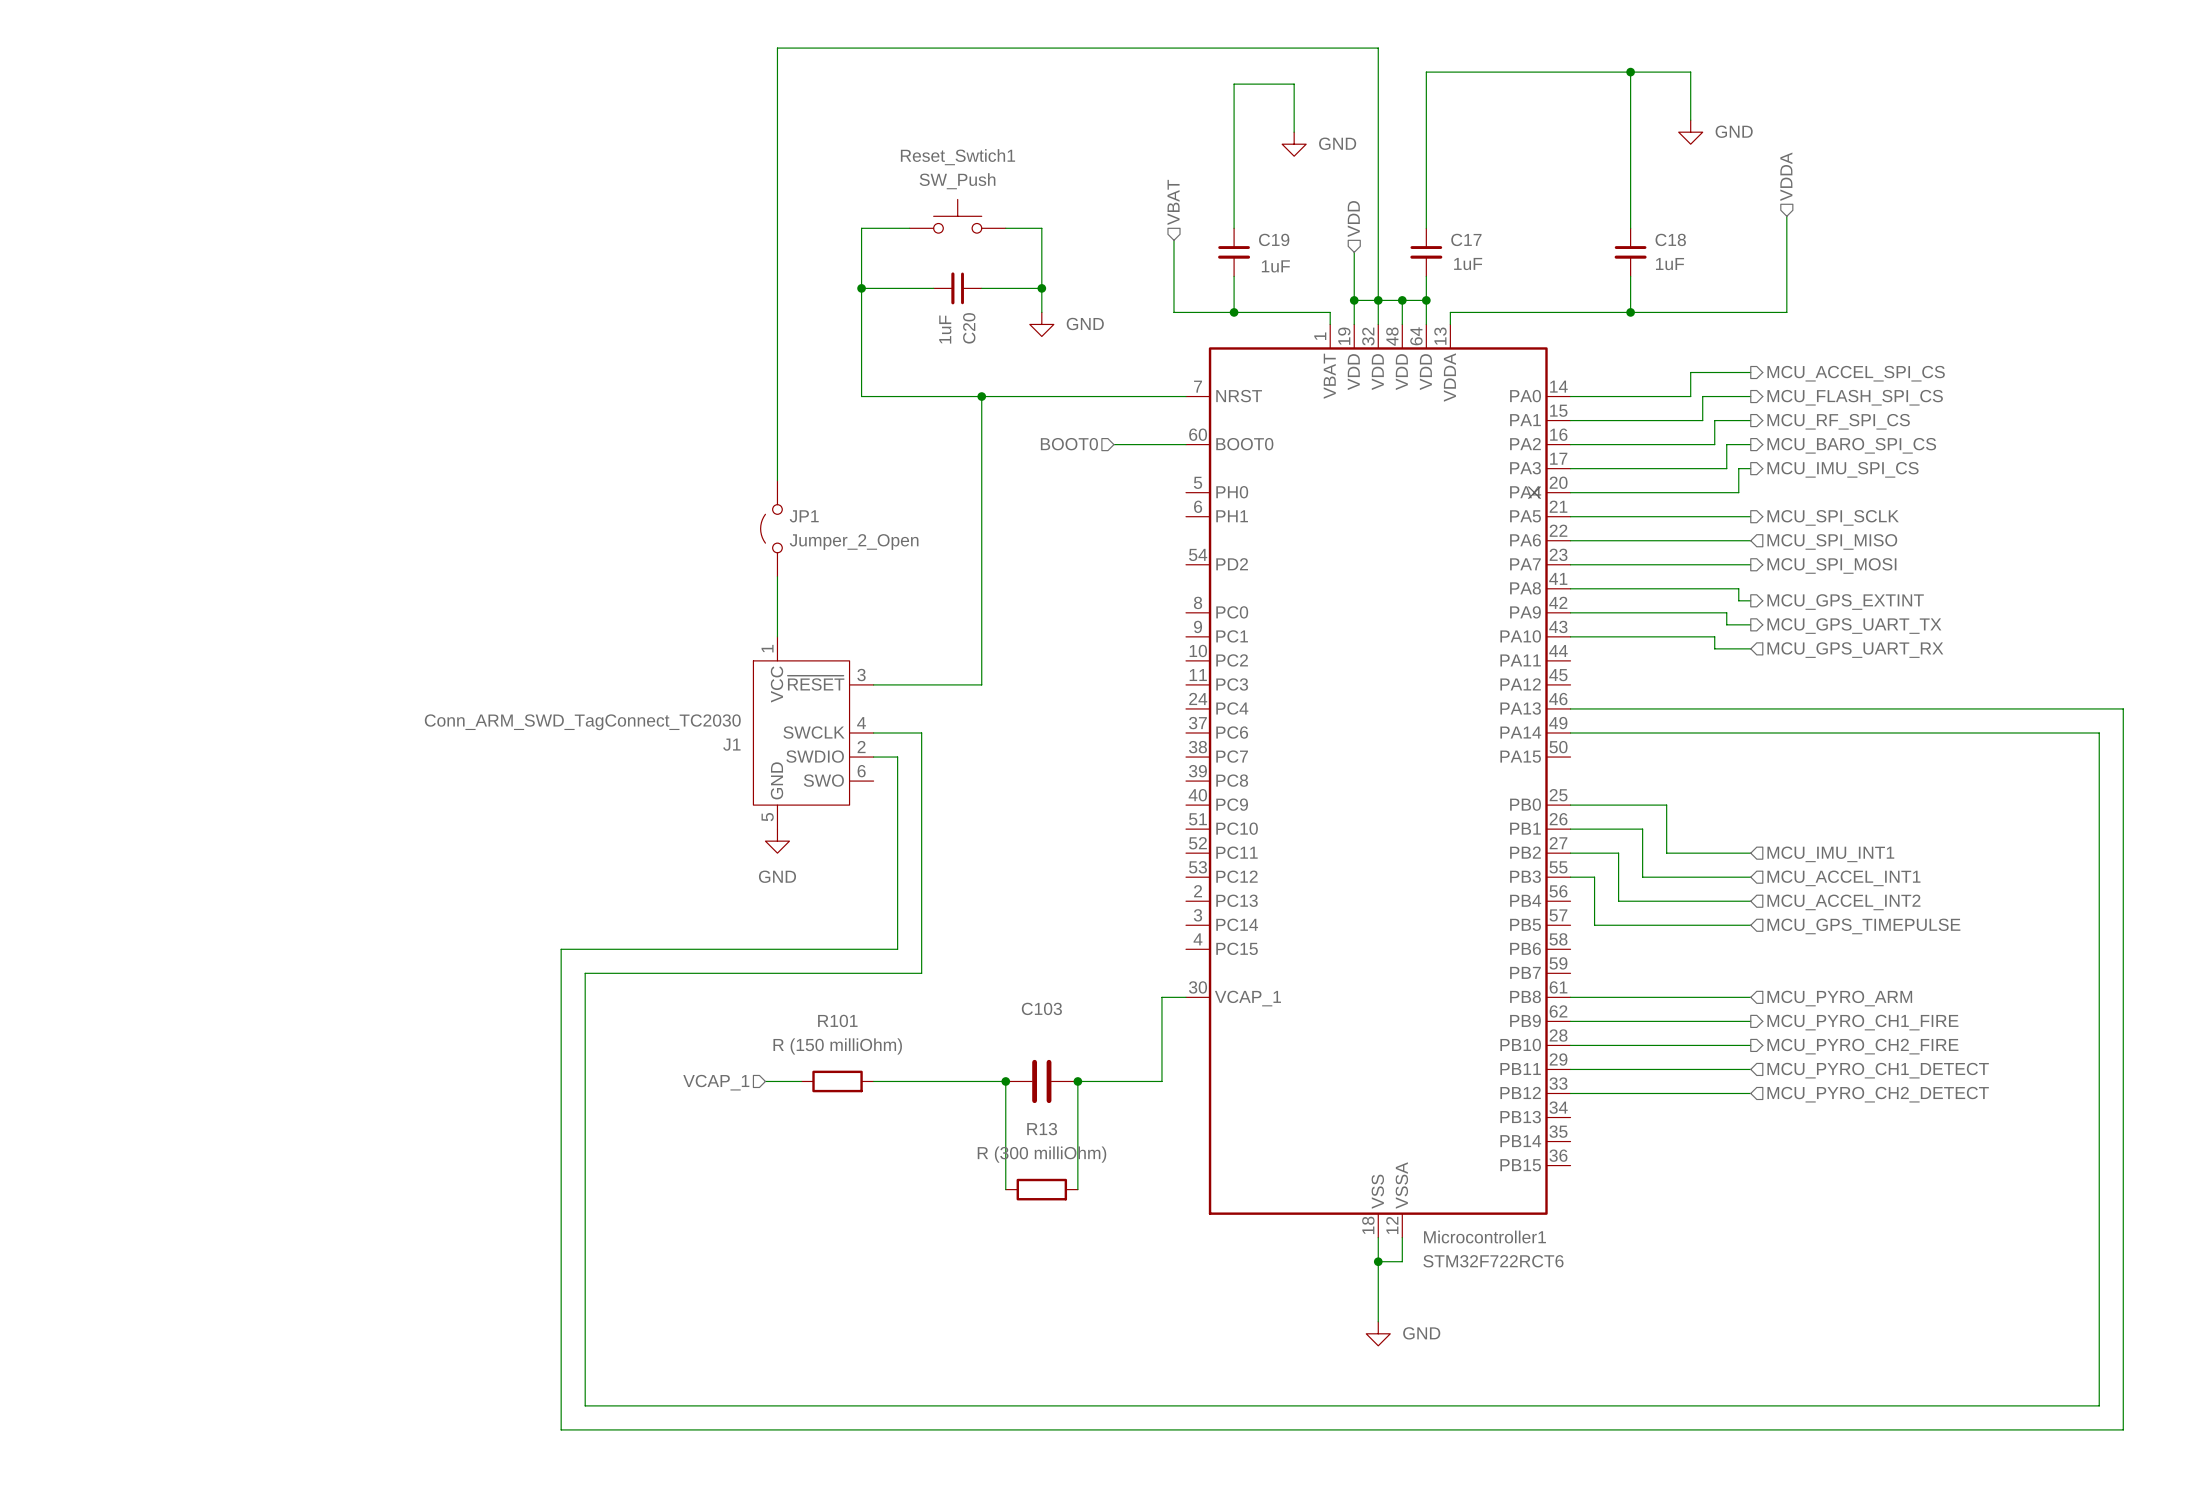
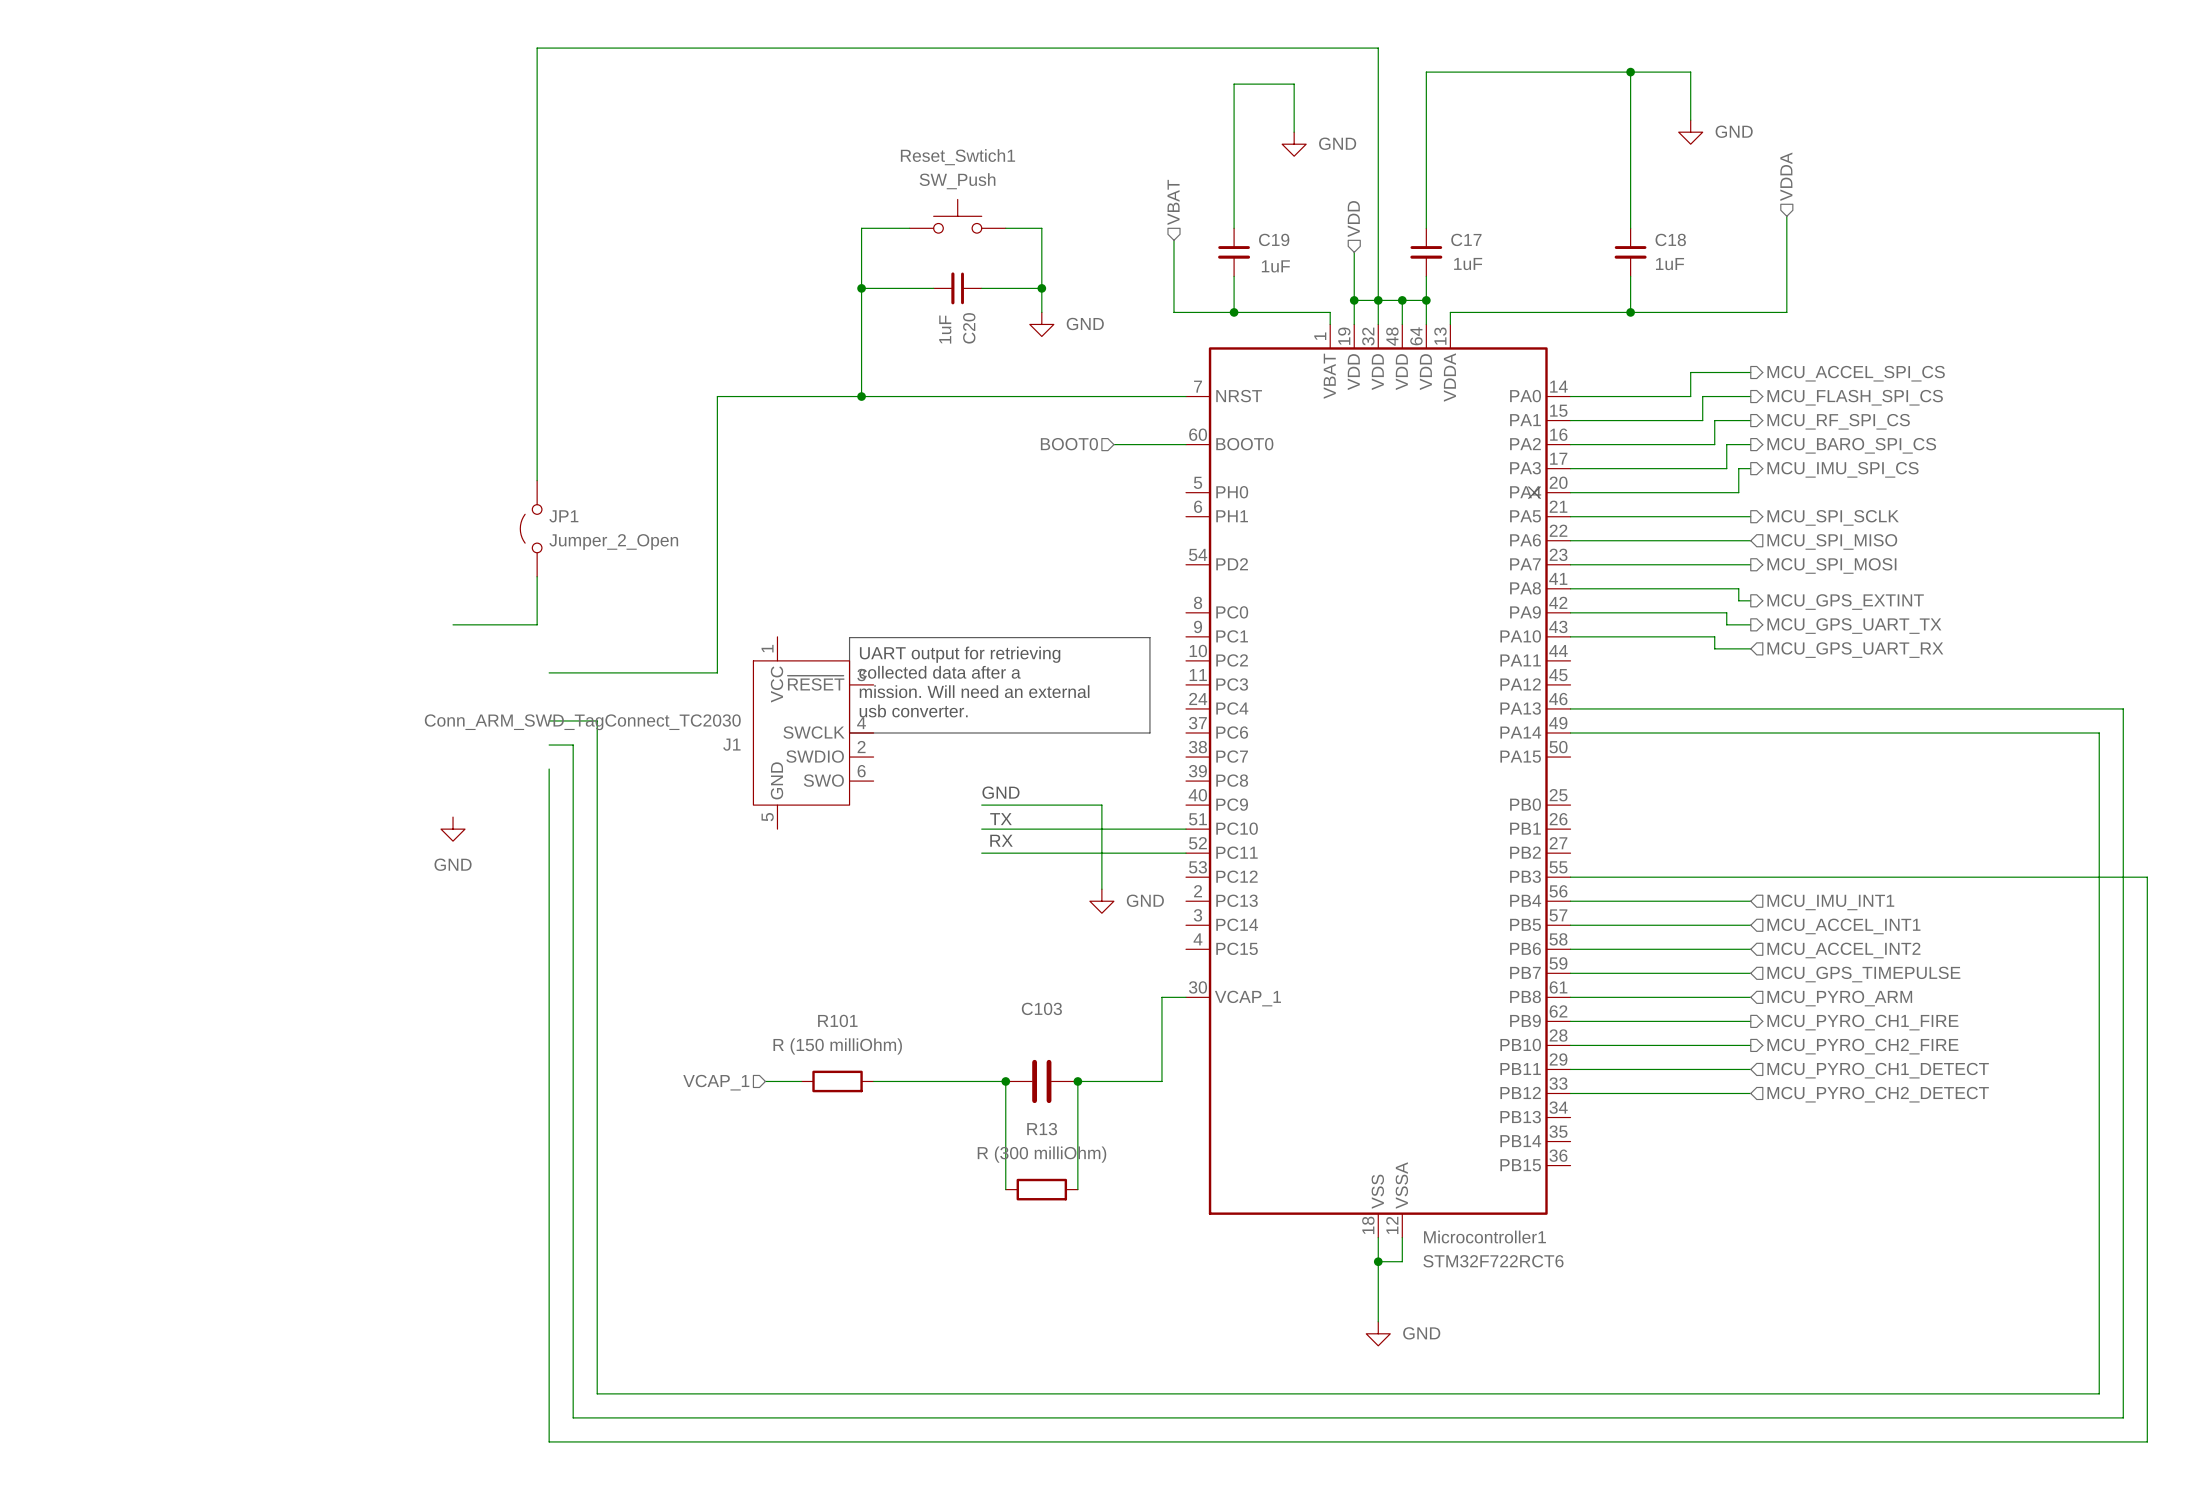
wire: (777, 48) (777, 480) -> (777, 48) (537, 48) (537, 480)
wire: none -> (861, 396) (717, 396) (717, 672) (549, 672)
junction: none -> (861, 396)
wire: (981, 396) (981, 684) (873, 684) -> none
junction: (981, 396) -> none
JP1 position: (771, 528) -> (531, 528)
wire: none -> (537, 576) (537, 624) (453, 624)
wire: (777, 576) (777, 636) -> none
line: none -> (849, 637) (1149, 637) (1149, 732) (849, 732) (849, 637)
text: none -> UART output for retrieving (960, 654)
text: none -> collected data after a (940, 672)
text: none -> mission. Will need an external (974, 691)
text: none -> usb converter. (913, 711)
wire: (873, 732) (921, 732) (921, 973) (585, 973) (585, 1405) (2099, 1405) (2099, 1393) -> (549, 720) (597, 720) (597, 1393) (2099, 1393)
wire: (873, 757) (897, 757) (897, 949) (561, 949) (561, 1429) (2123, 1429) (2123, 1417) -> (549, 745) (573, 745) (573, 1417) (2123, 1417)
wire: none -> (549, 769) (549, 1441) (2147, 1441) (2147, 877) (1750, 877)
text: none -> GND (1000, 792)
wire: none -> (981, 805) (1101, 805) (1101, 889)
wire: (1570, 805) (1666, 805) (1666, 853) (1750, 853) -> none
text: none -> TX (1000, 819)
power symbol: none -> GND (453, 829)
wire: none -> (981, 829) (1186, 829)
wire: (1570, 829) (1642, 829) (1642, 877) -> (1594, 877) (1642, 877)
text: none -> RX (1001, 840)
power symbol: GND (777, 841) -> none
wire: none -> (981, 853) (1186, 853)
wire: (1570, 853) (1618, 853) (1618, 901) -> (1570, 901) (1618, 901)
hierarchical label: MCU_IMU_INT1 (1830, 854) -> none
wire: (1594, 877) (1594, 925) -> (1570, 925) (1594, 925)
hierarchical label: MCU_ACCEL_INT1 (1843, 878) -> none
power symbol: none -> GND (1101, 901)
hierarchical label: MCU_ACCEL_INT2 (1843, 902) -> MCU_IMU_INT1 (1830, 902)
hierarchical label: MCU_GPS_TIMEPULSE (1863, 926) -> MCU_ACCEL_INT1 (1843, 926)
wire: none -> (1570, 949) (1750, 949)
hierarchical label: none -> MCU_ACCEL_INT2 (1843, 950)
wire: none -> (1570, 973) (1750, 973)
hierarchical label: none -> MCU_GPS_TIMEPULSE (1863, 974)

